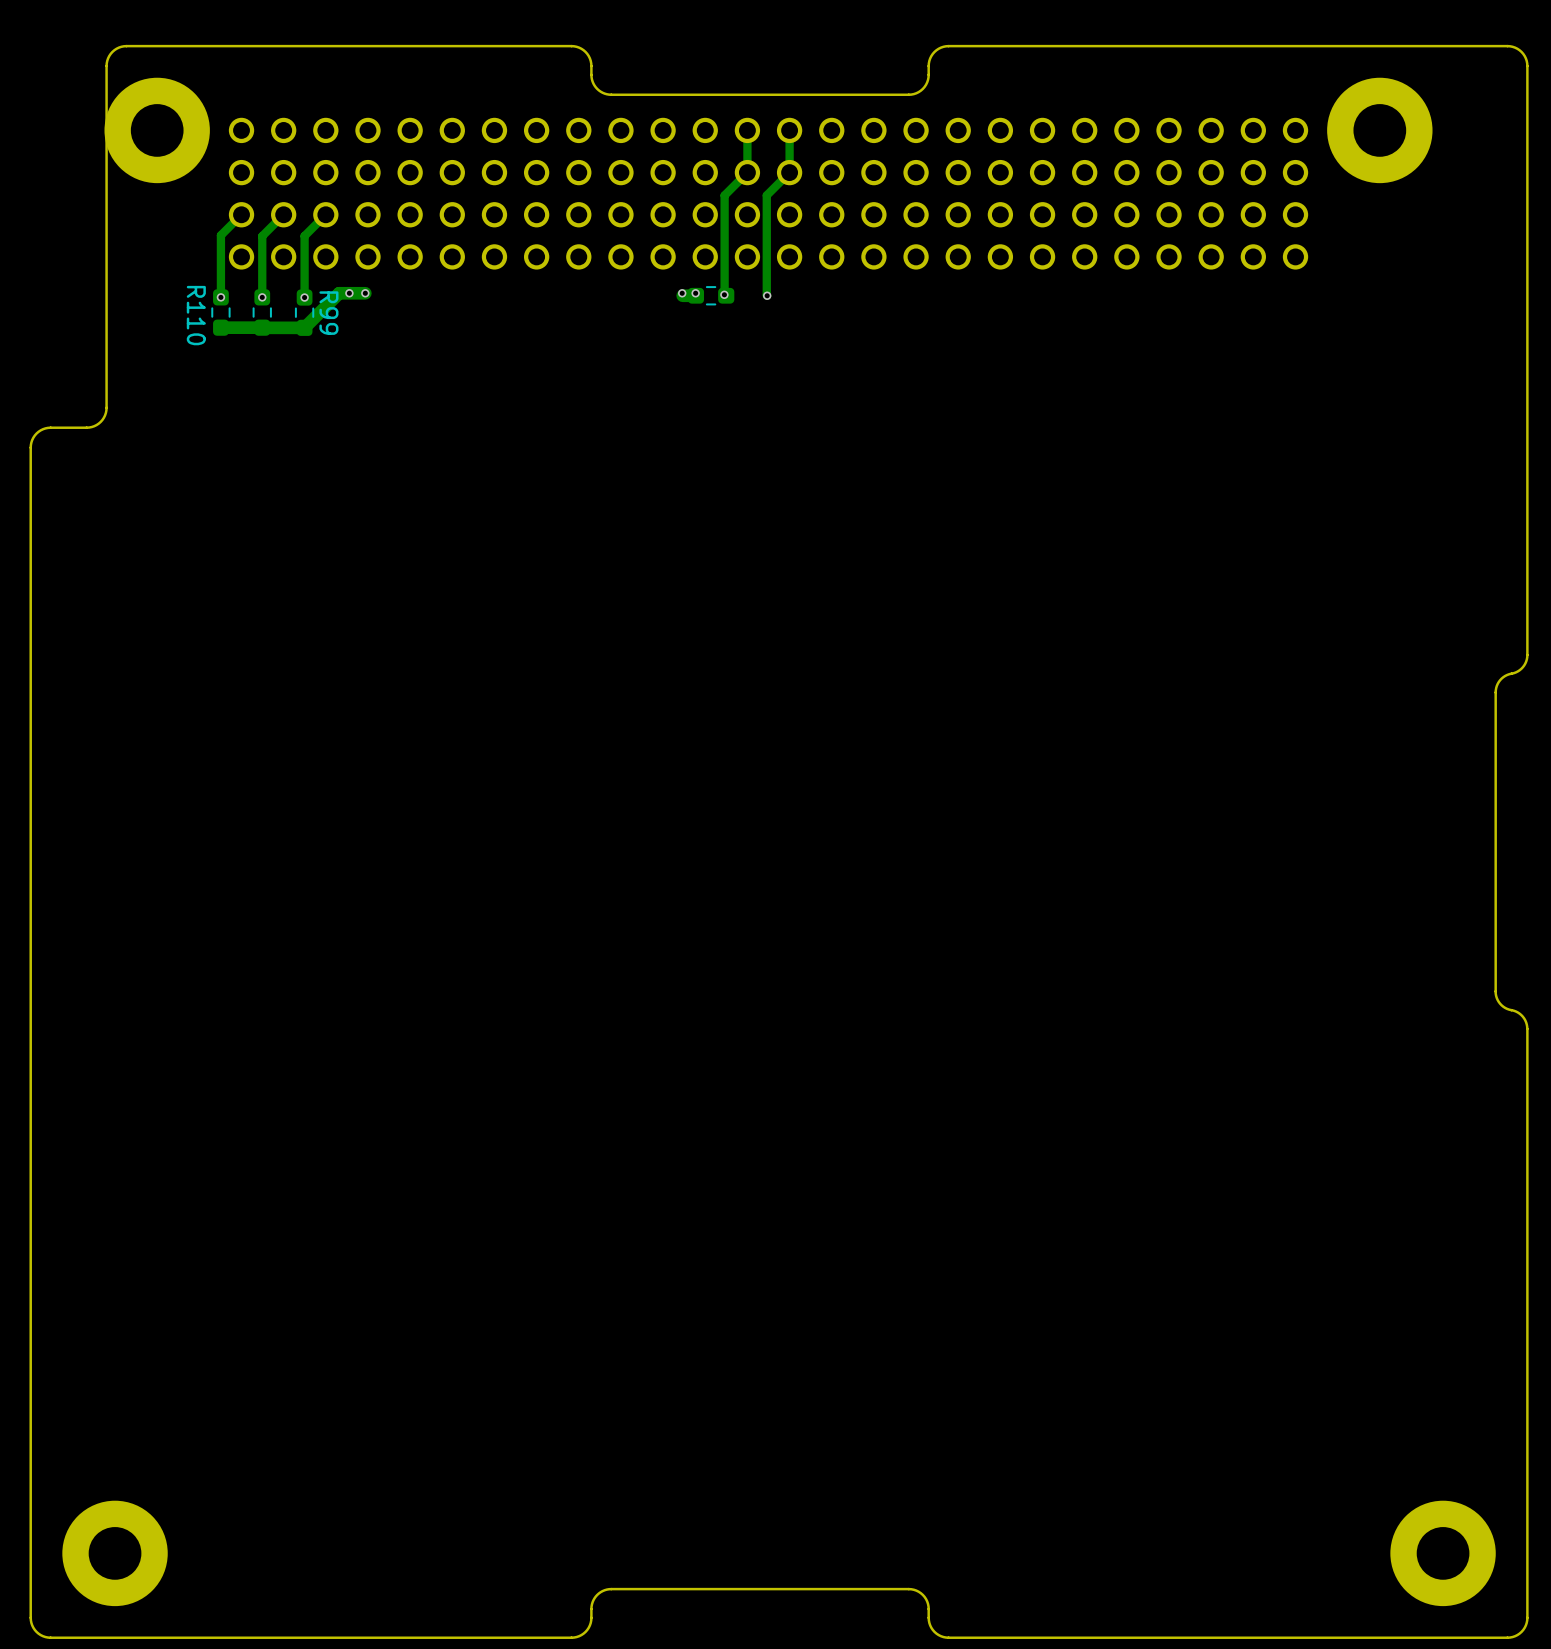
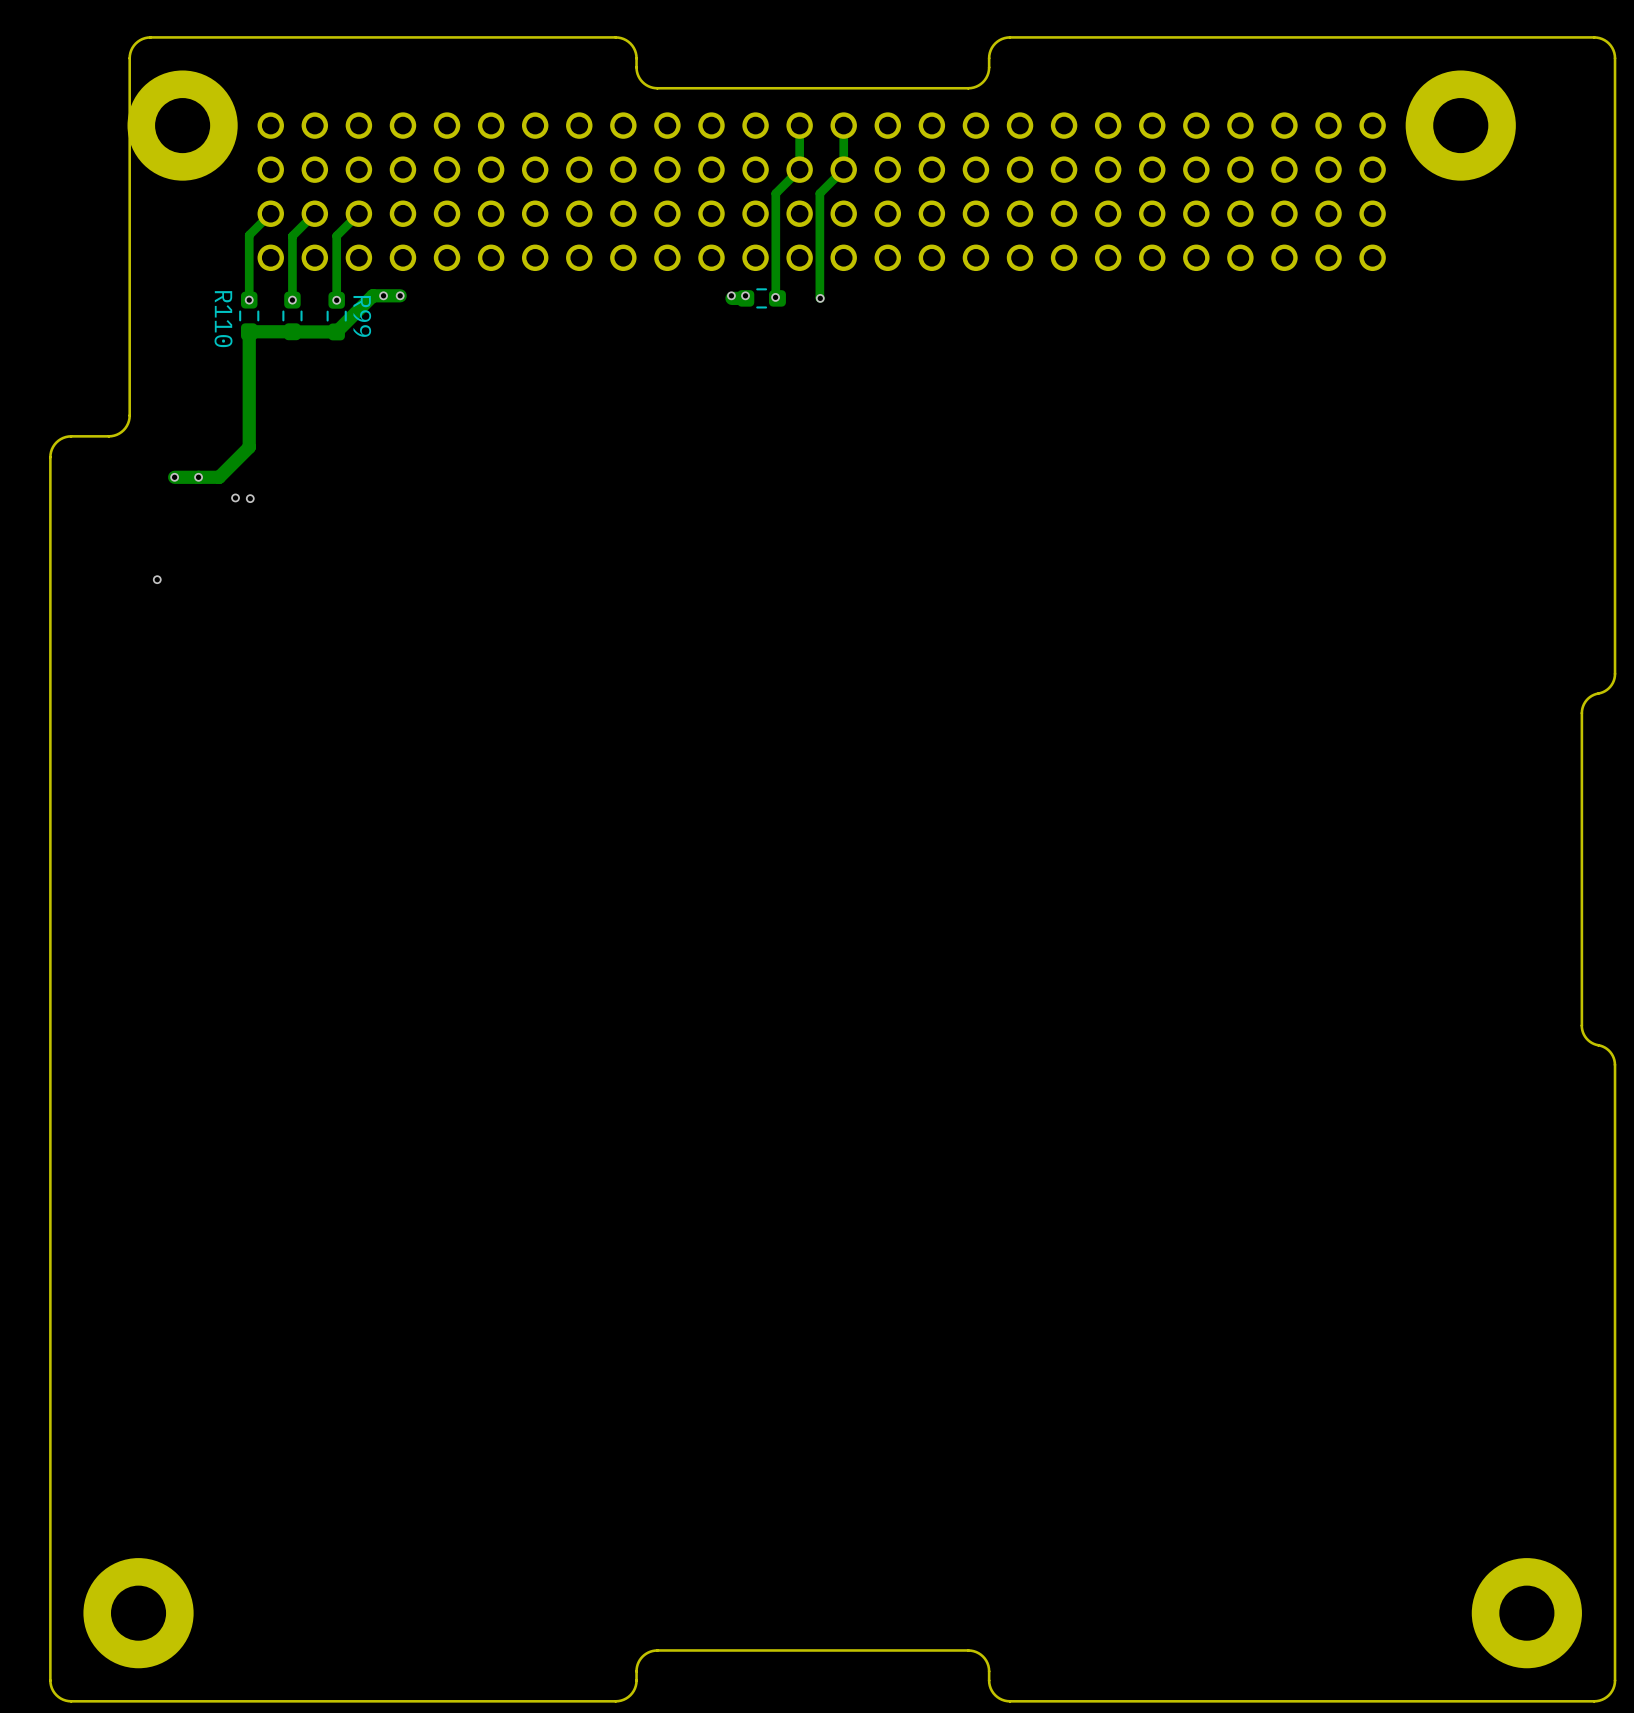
track: none -> (249, 331) (249, 447) (219, 477) (174, 477)
via: none -> (174, 477)
via: none -> (198, 477)
via: none -> (235, 497)
via: none -> (250, 498)
via: none -> (157, 579)

